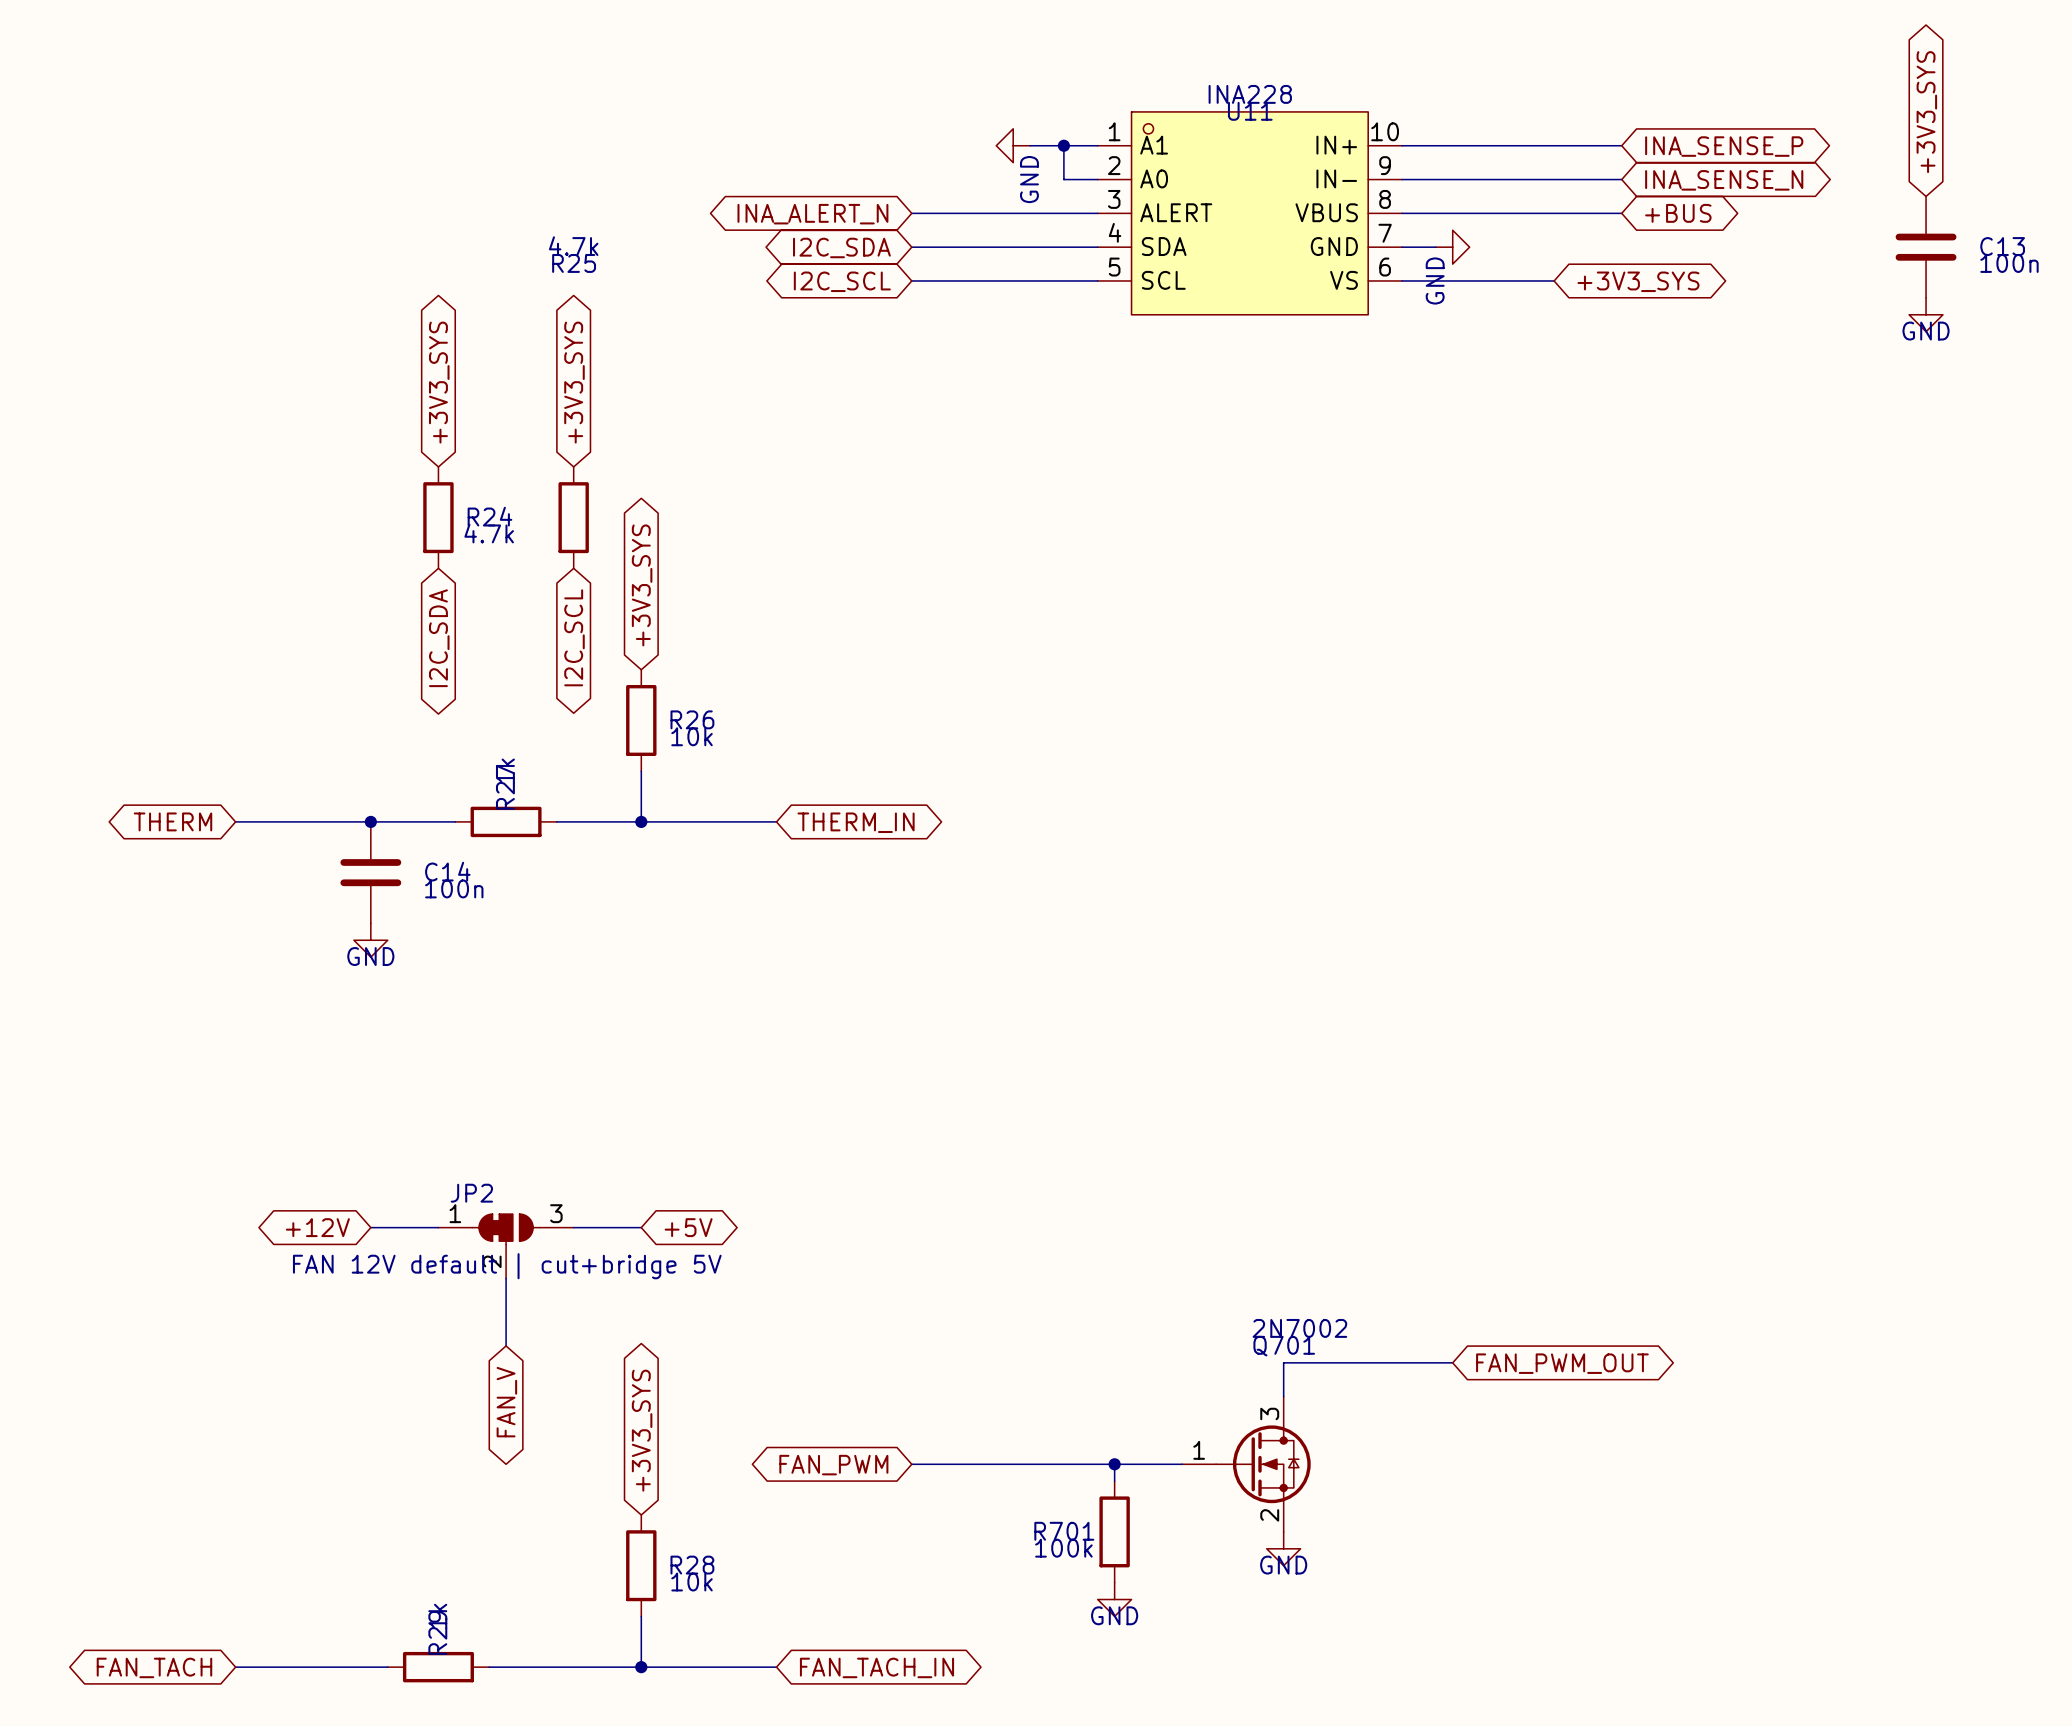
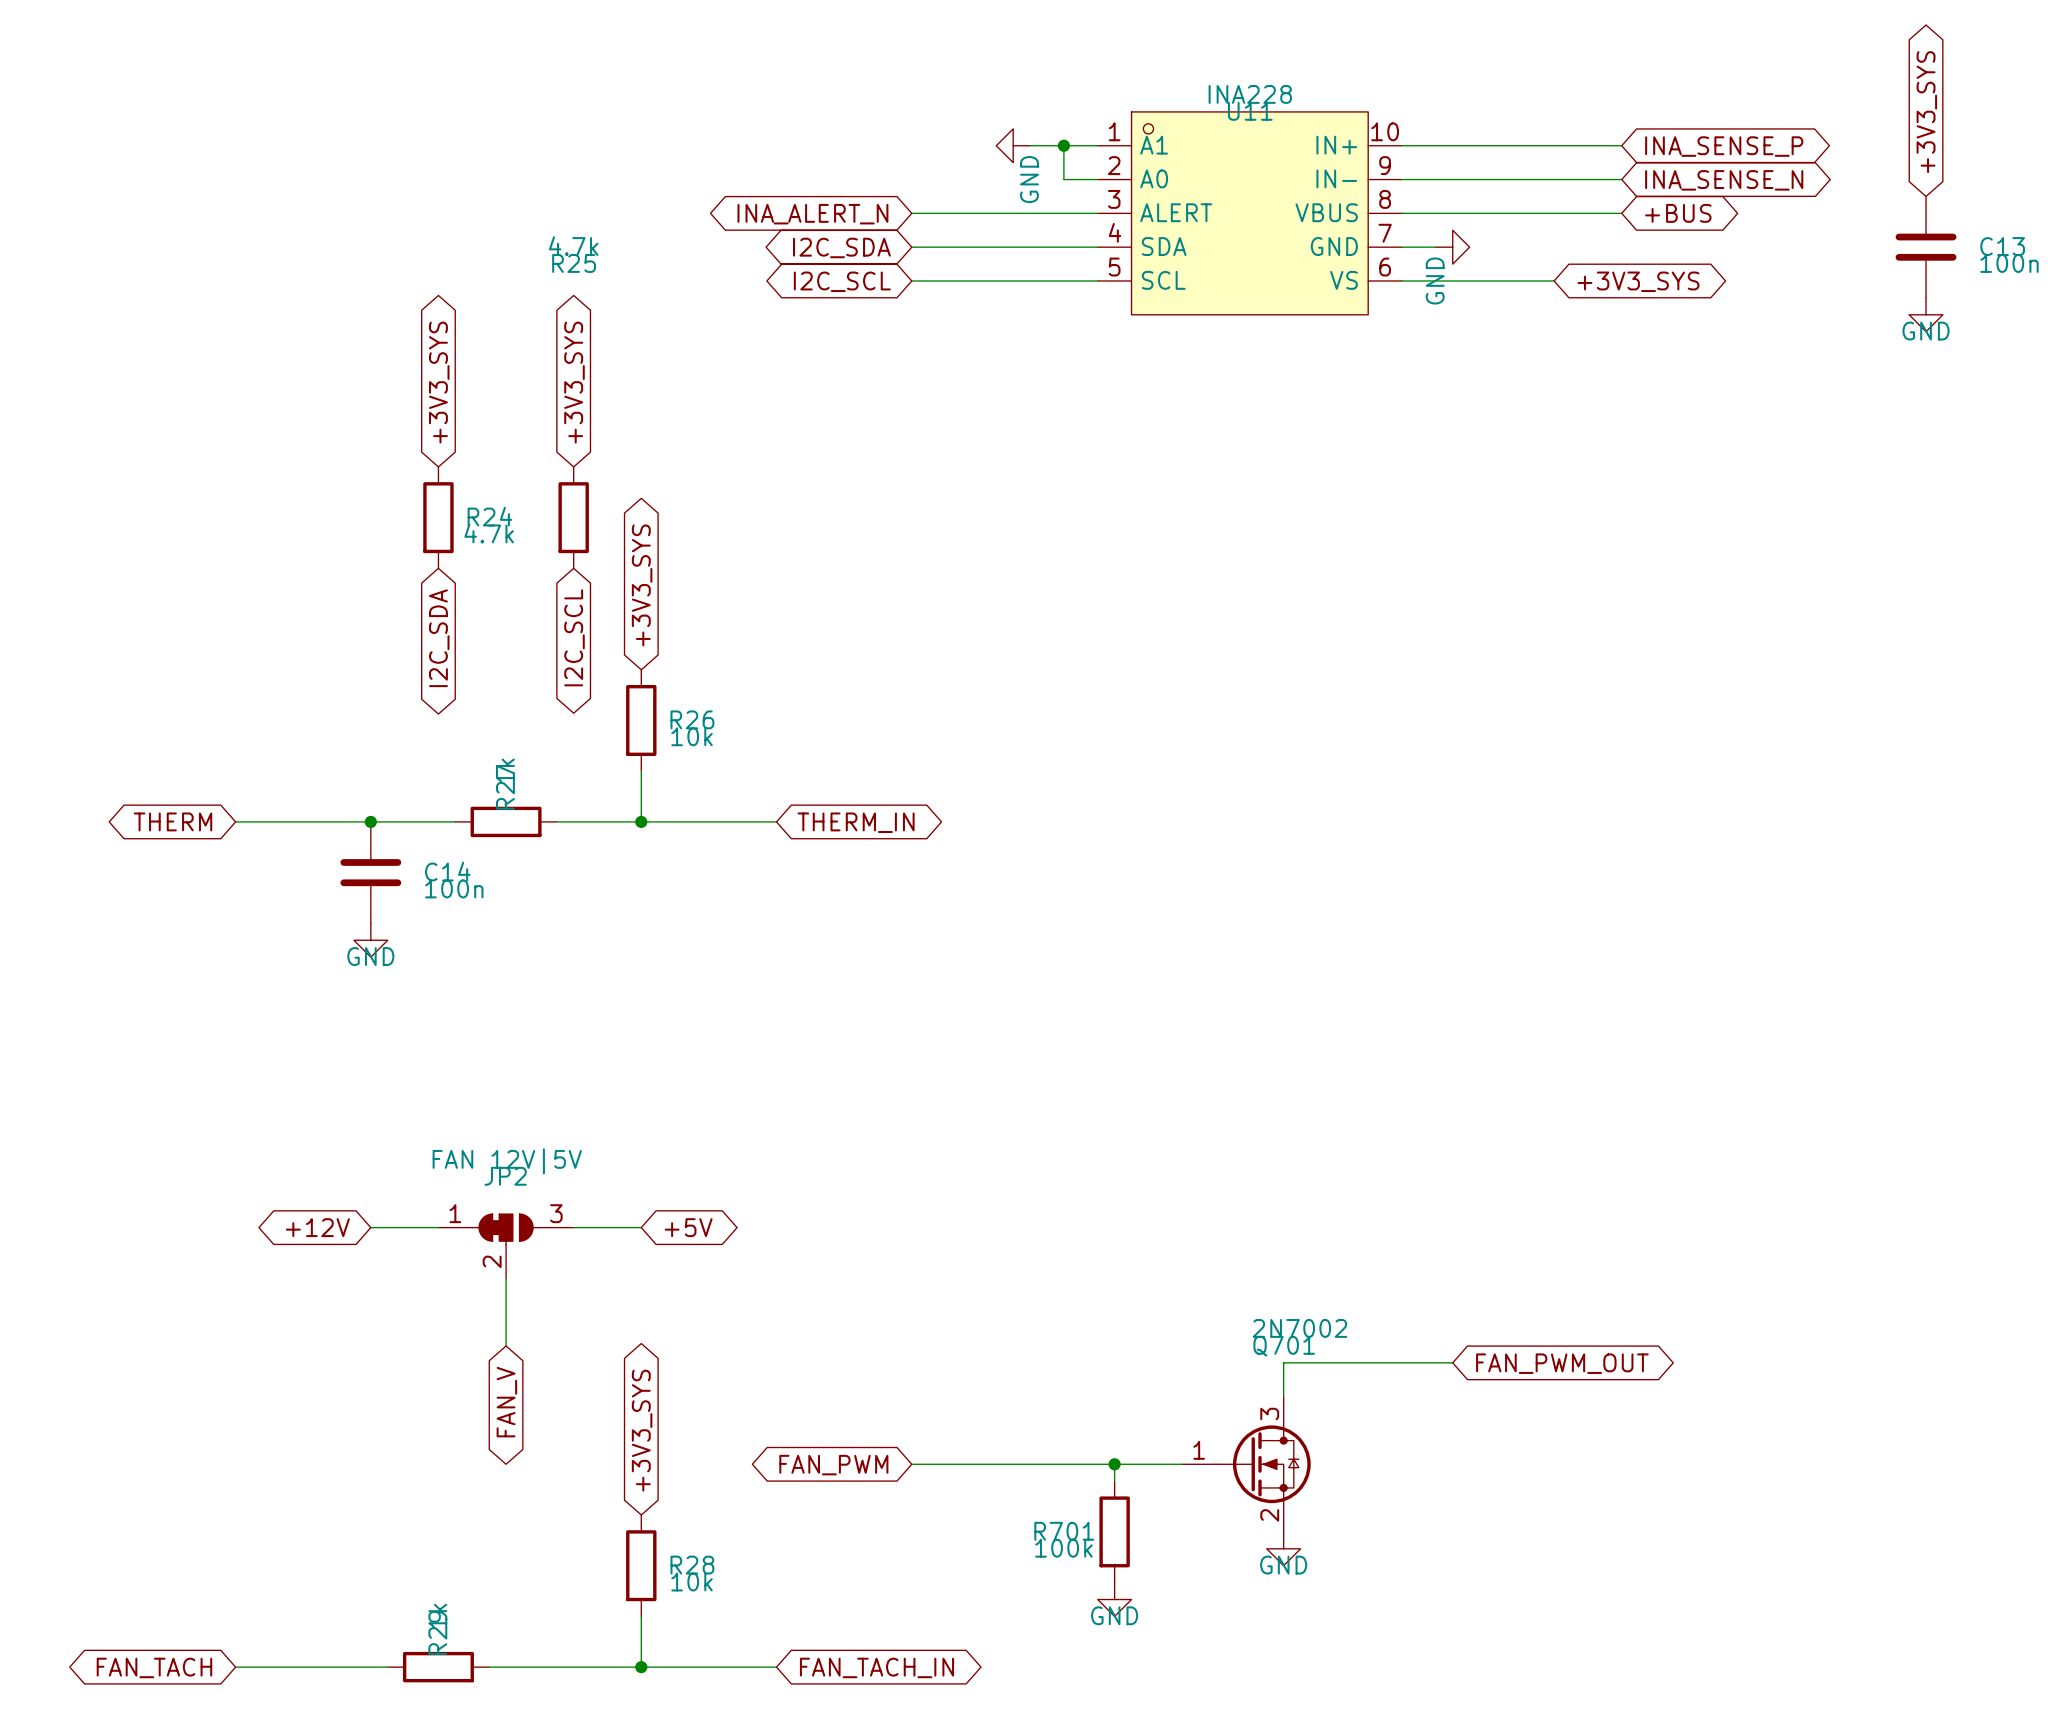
JP2 name position: JP2 (471, 1193) -> JP2 (505, 1176)
JP2 value: FAN 12V default | cut+bridge 5V (507, 1266) -> FAN 12V|5V (507, 1161)

